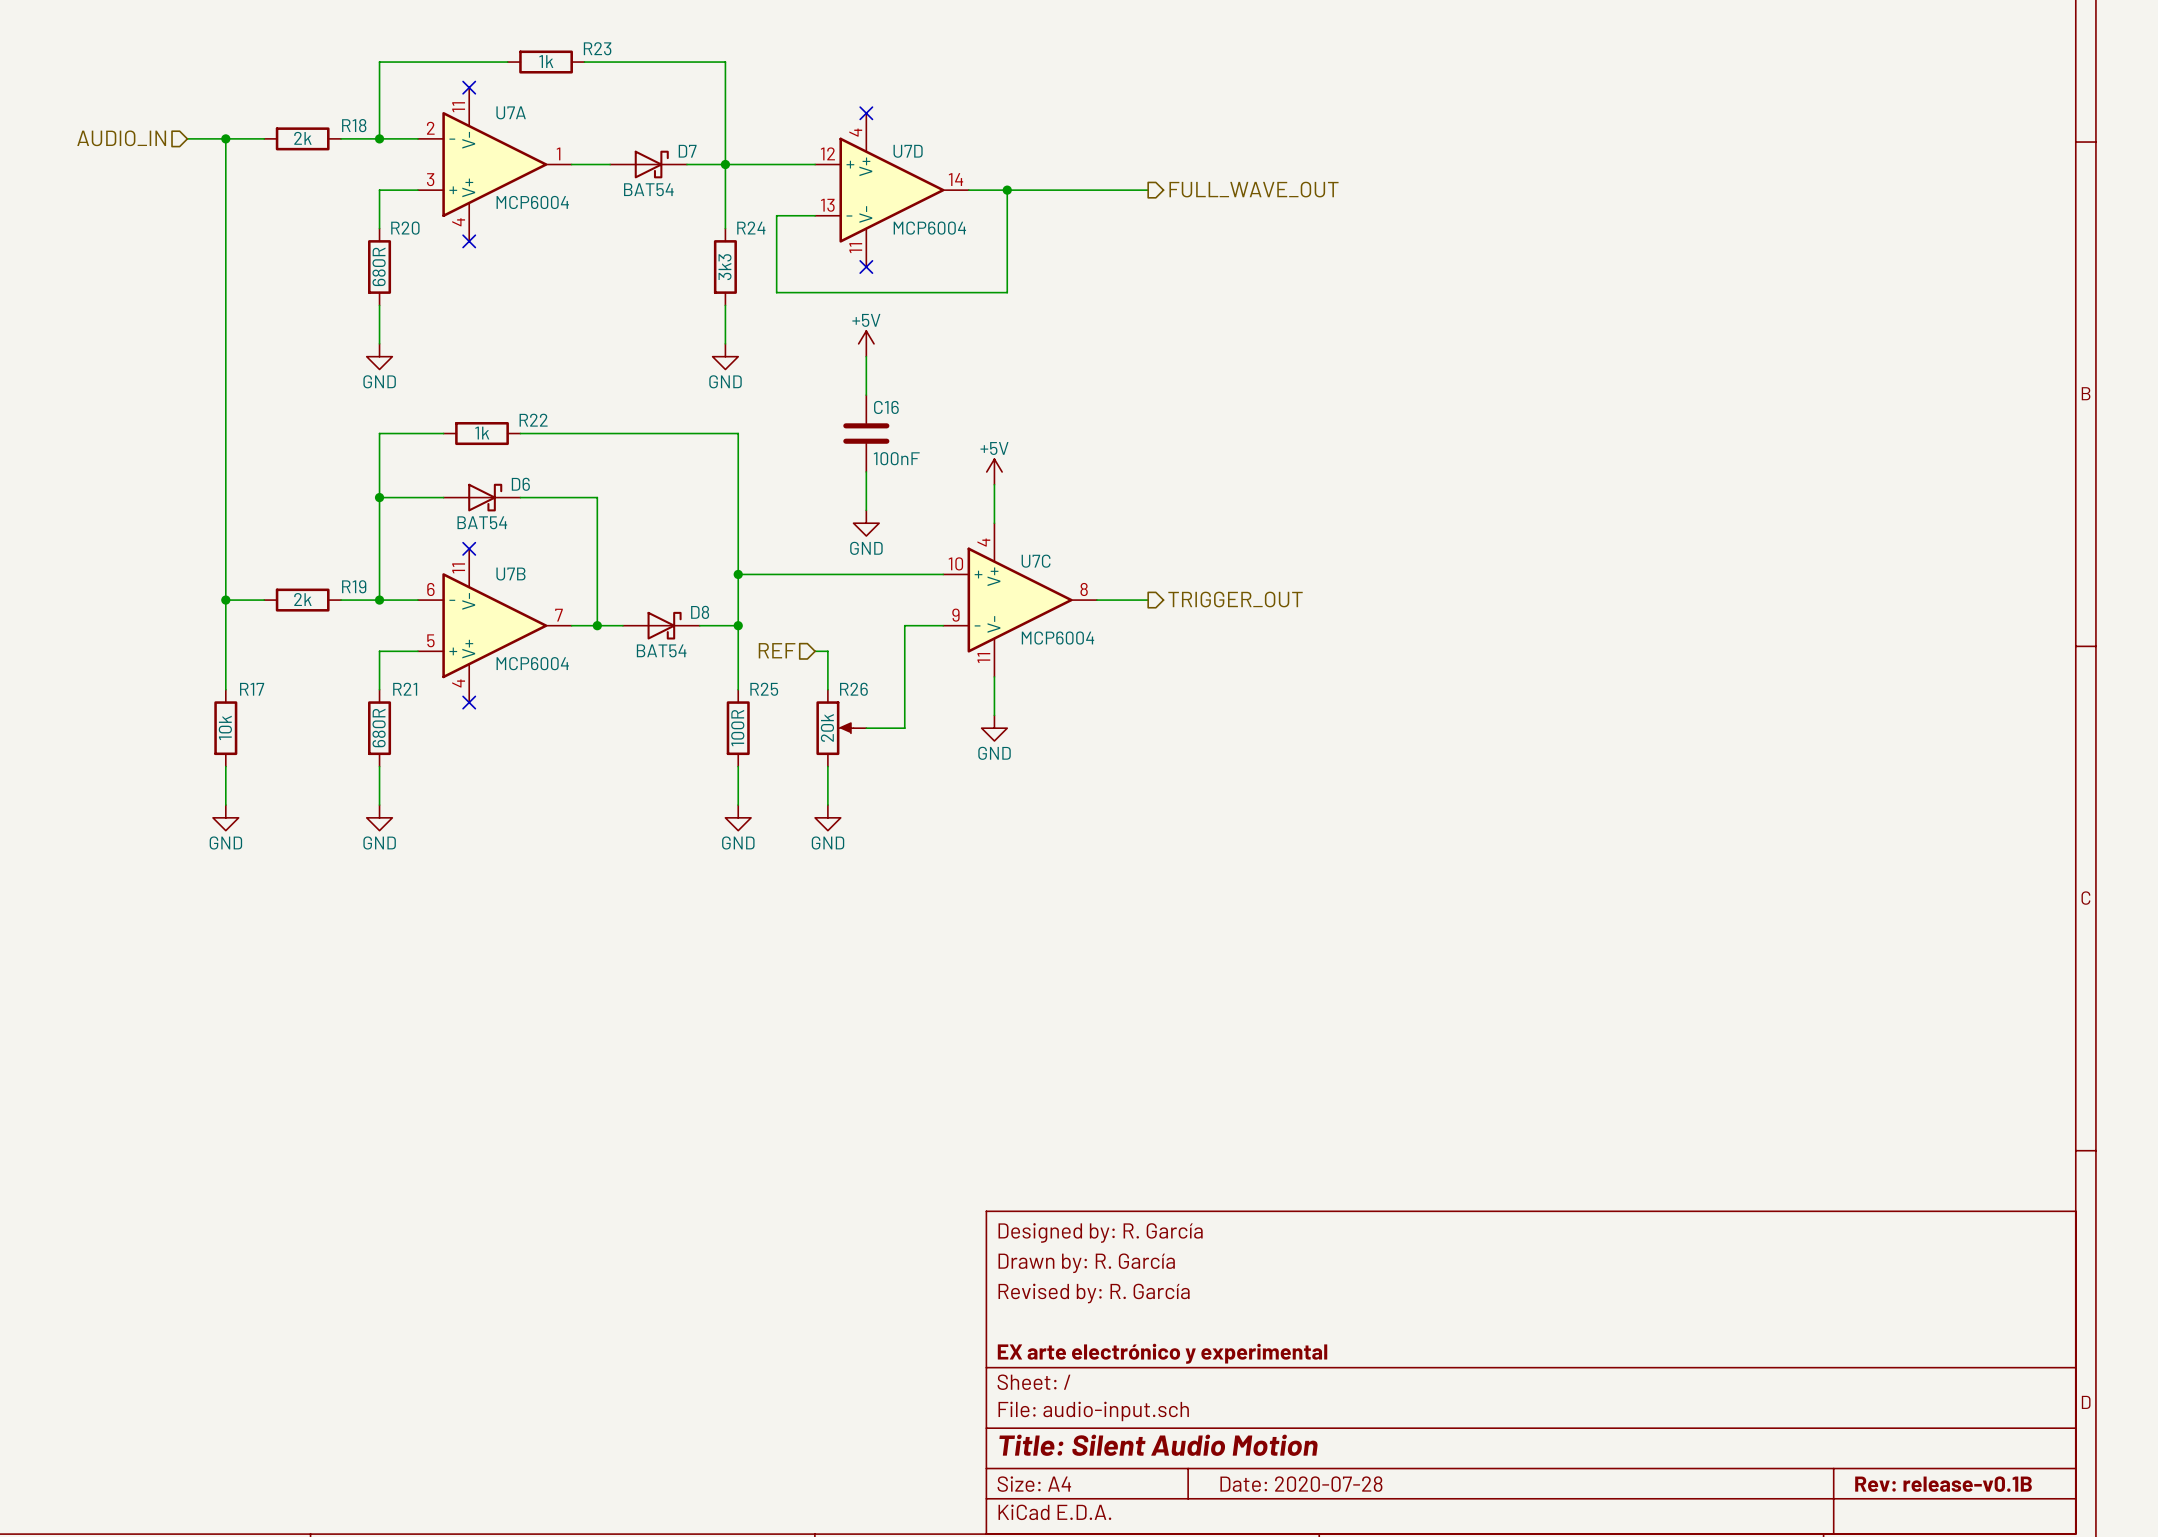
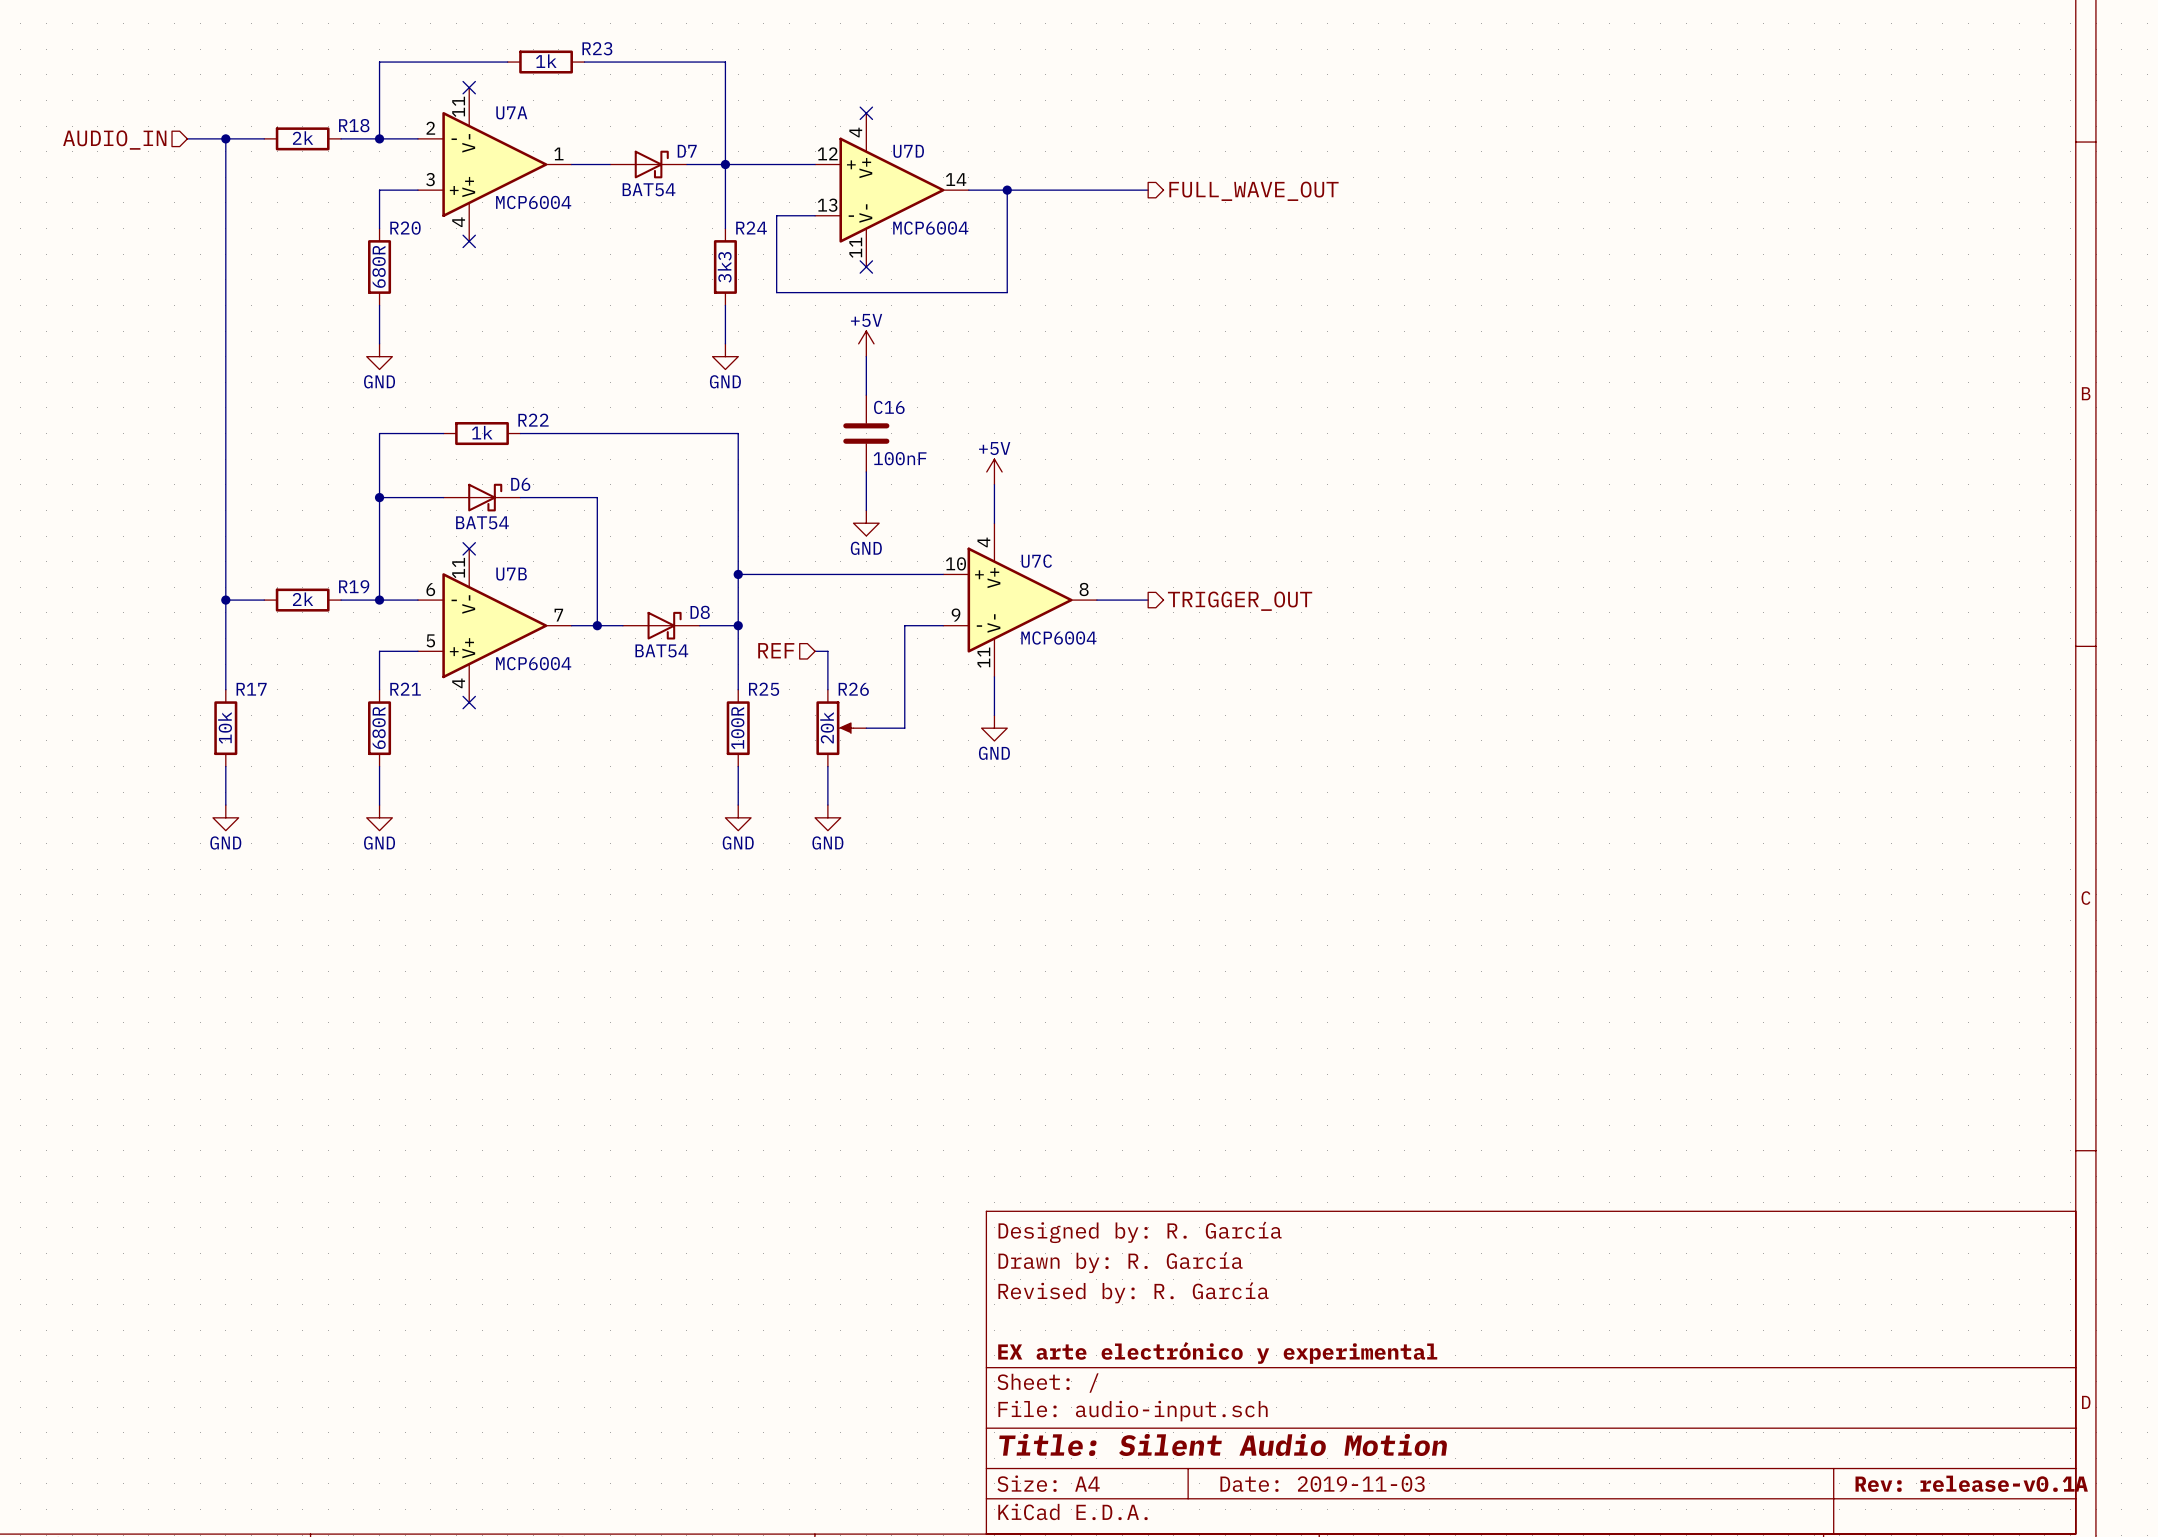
title block: Date: 2020-07-28 (1301, 1484) -> Date: 2019-11-03 (1322, 1484)
title block: Rev: release-v0.1B (1943, 1484) -> Rev: release-v0.1A (1971, 1483)

